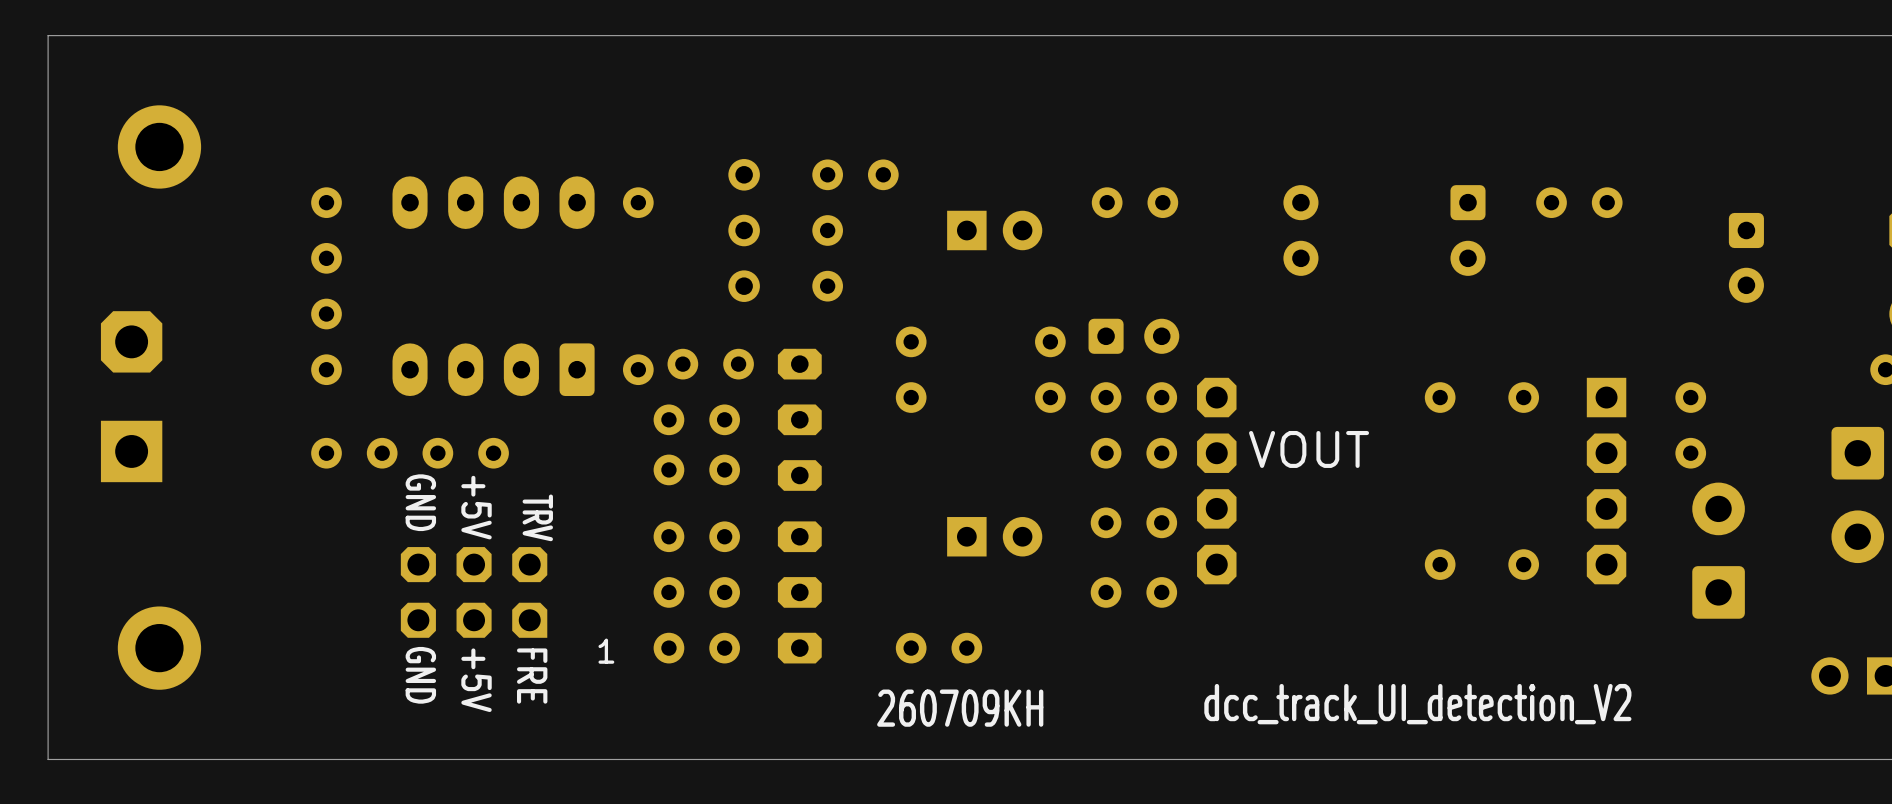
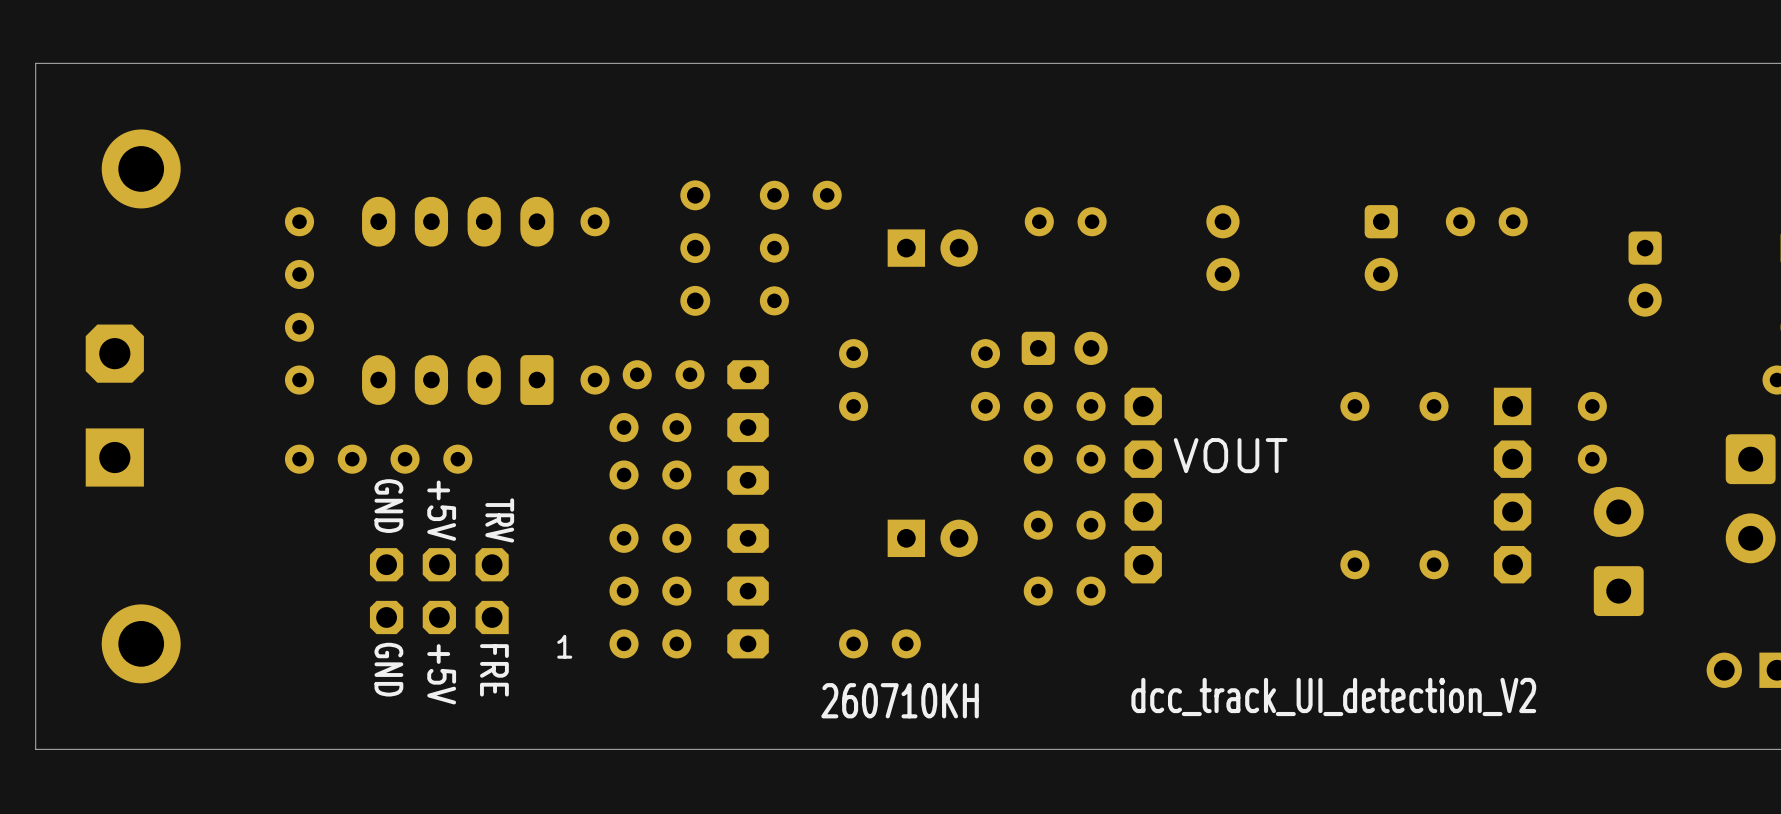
text: 260709KH (960, 708) -> 260710KH (900, 700)

